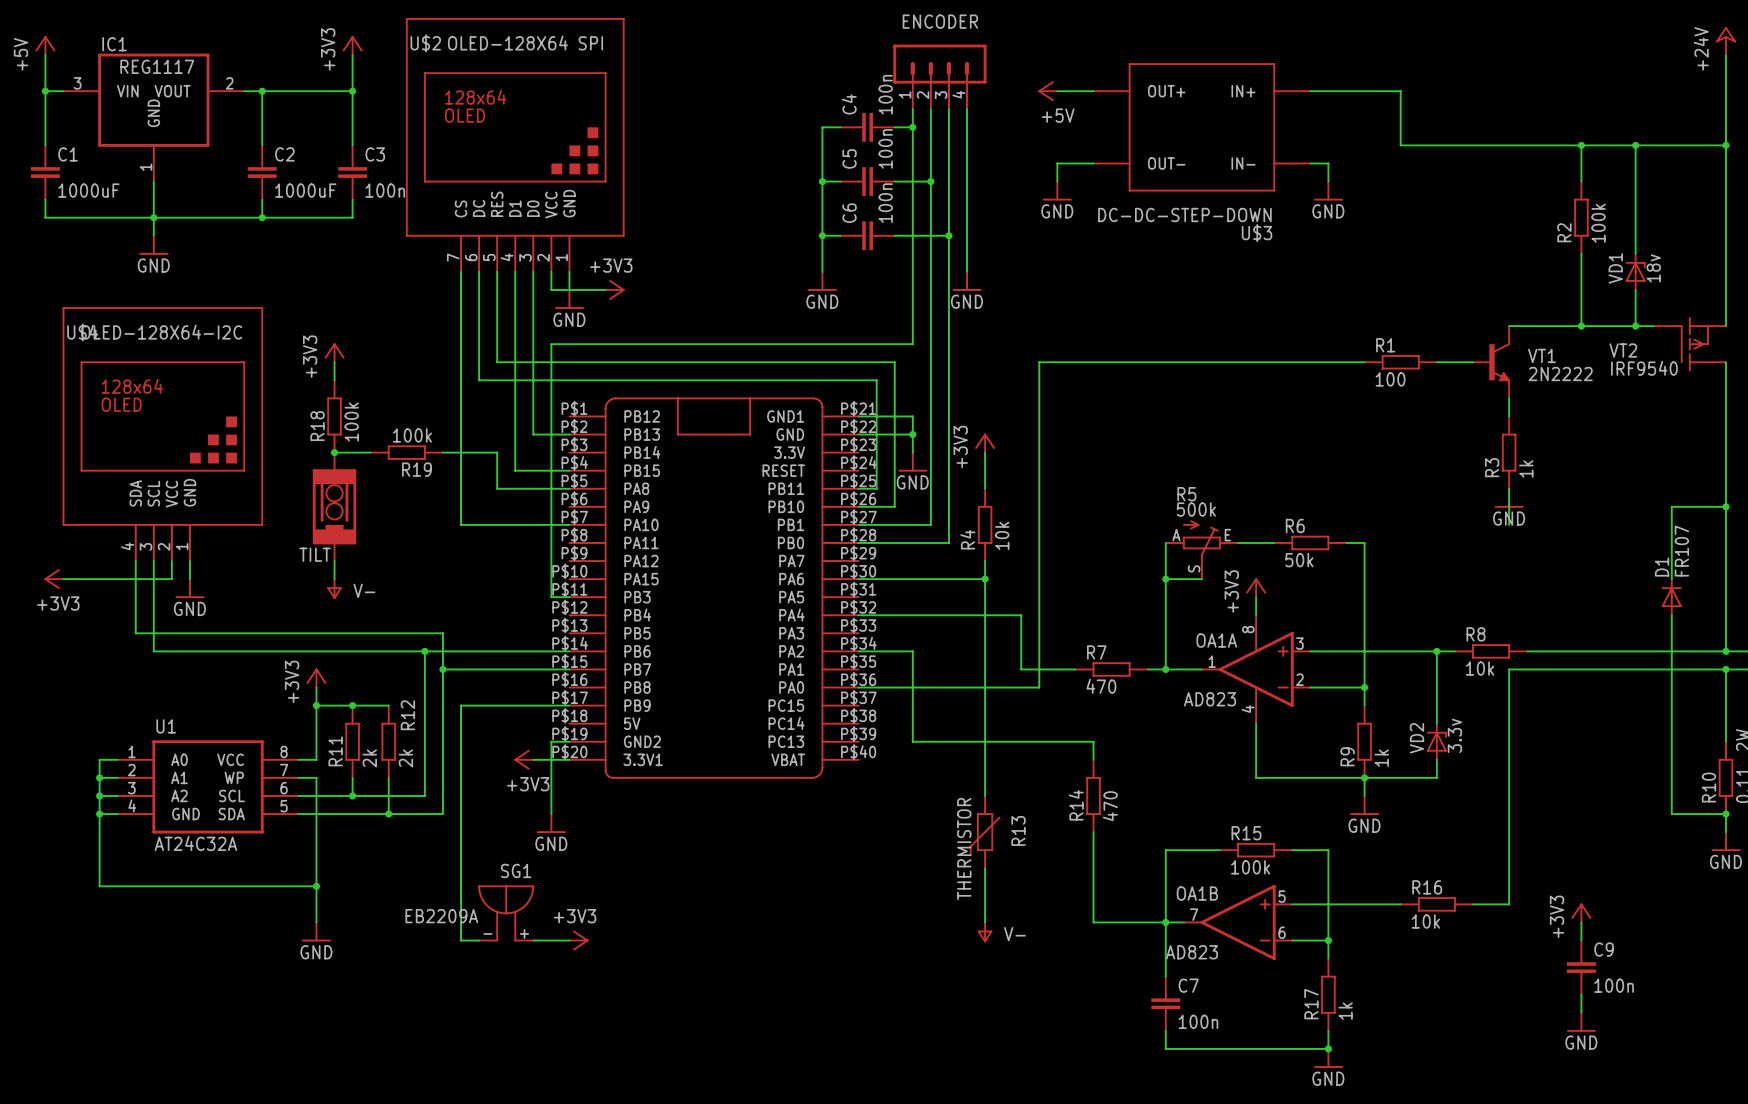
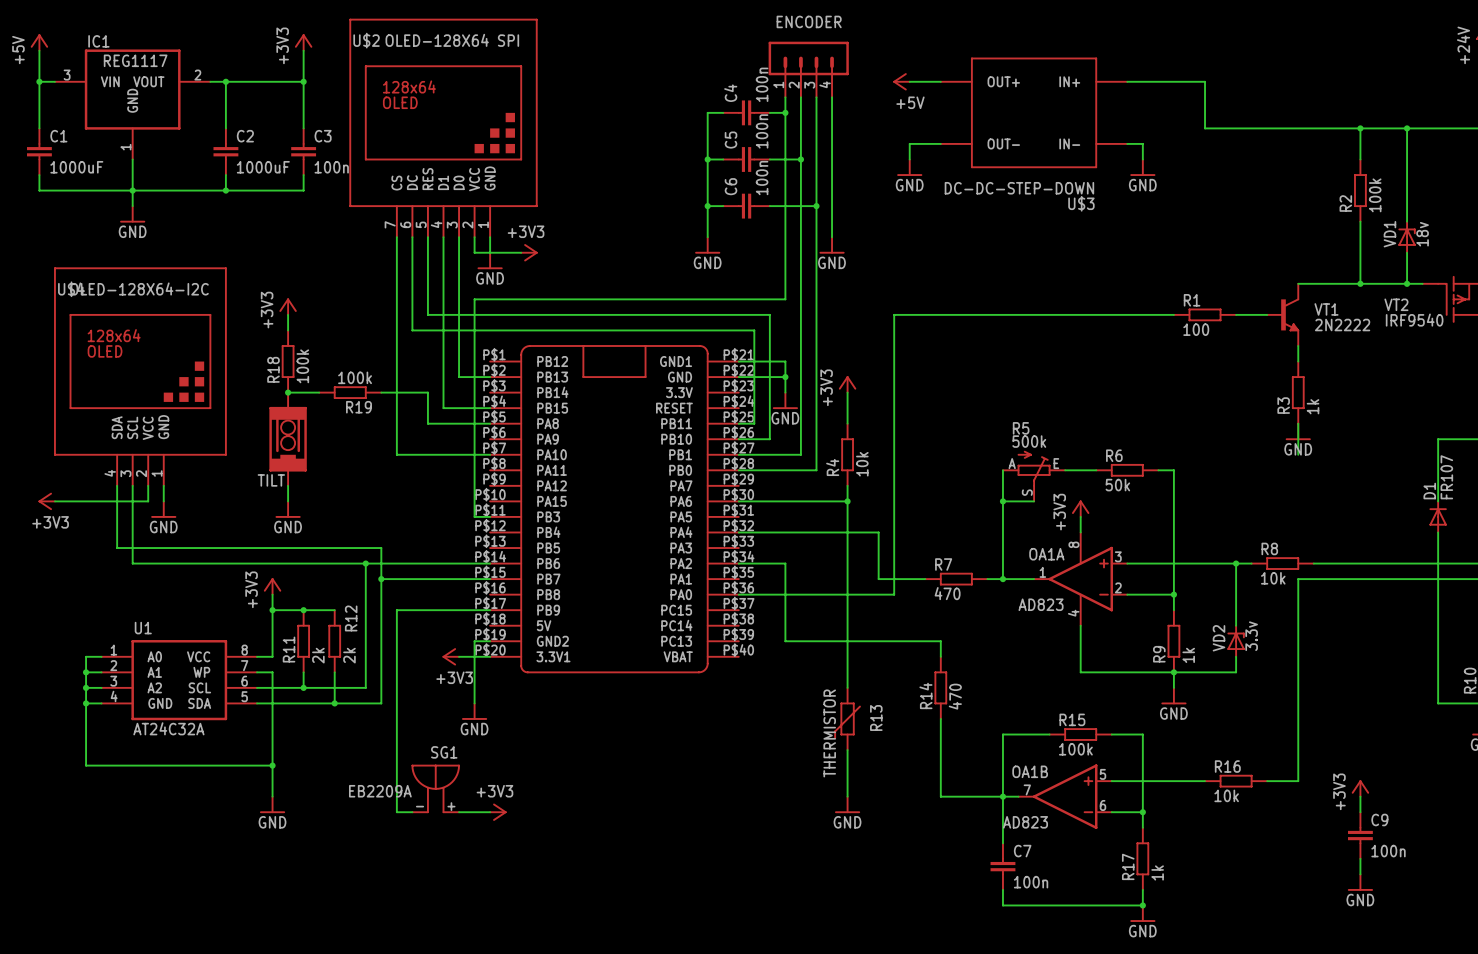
power symbol: V- (334, 589) -> GND (288, 509)
power symbol: V- (985, 932) -> GND (847, 804)

